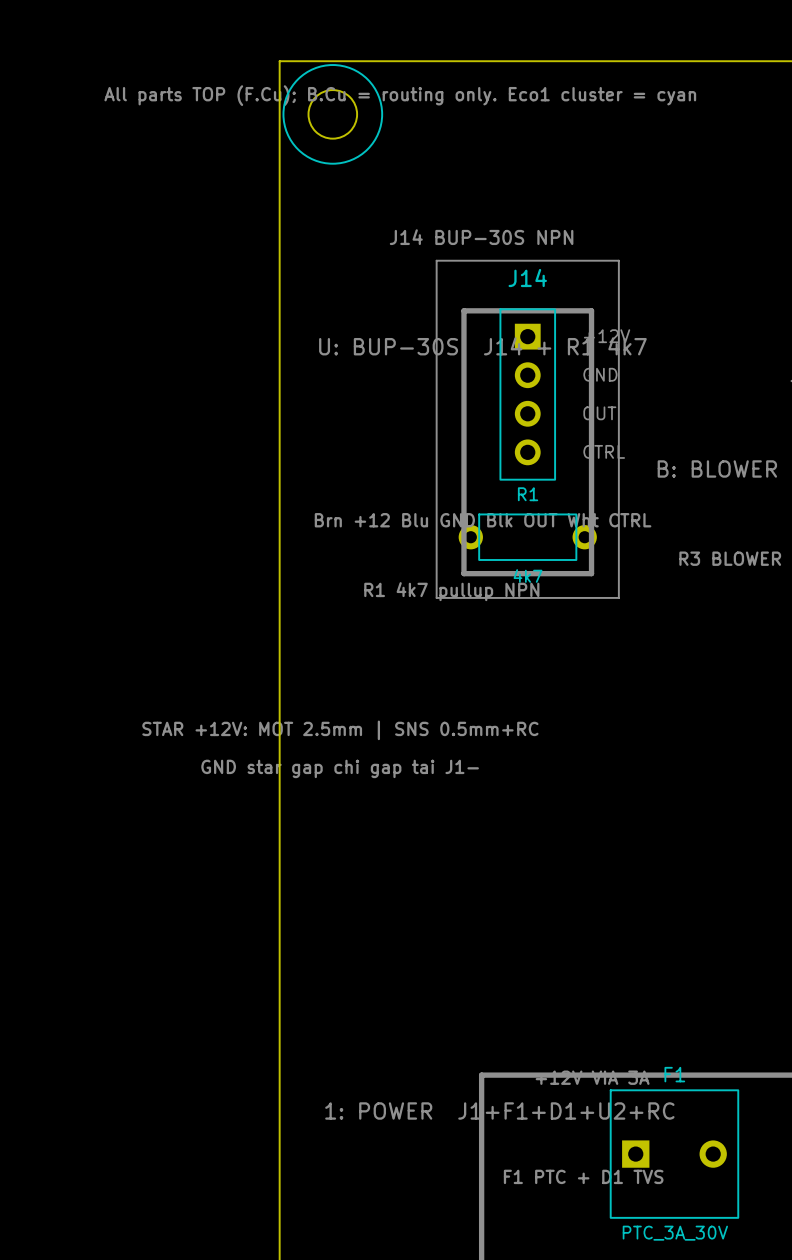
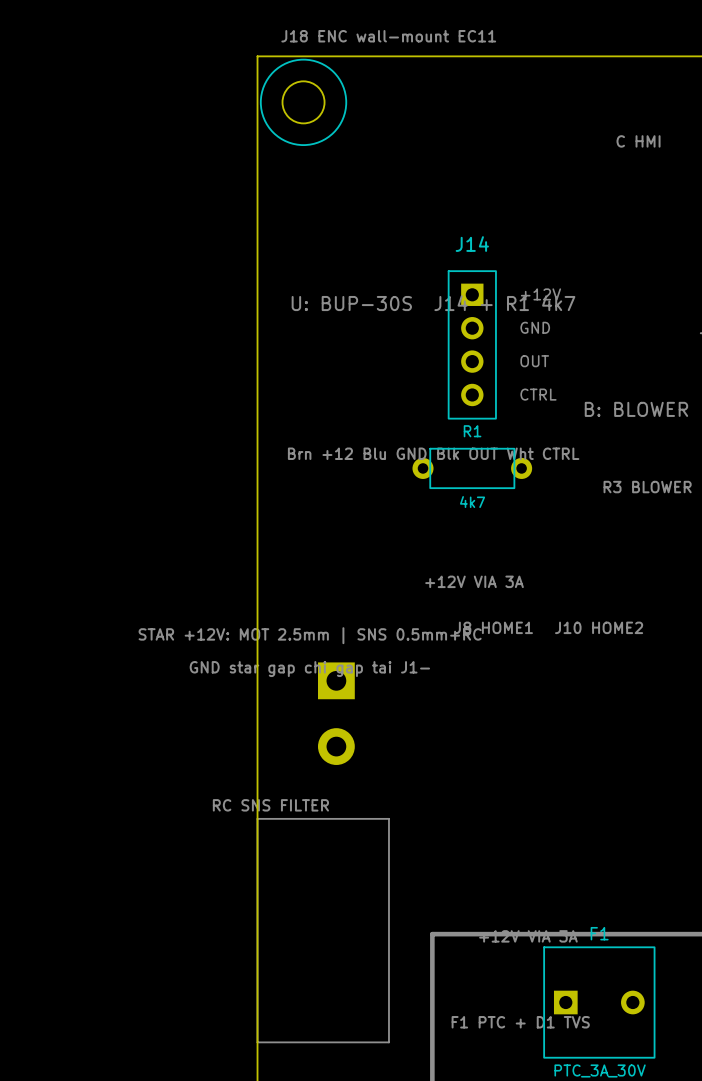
text: none -> J18 ENC wall-mount EC11 (388, 36)
text: All parts TOP (F.Cu); B.Cu = routing only. Eco1 cluster = cyan (400, 95) -> none
text: none -> C HMI (638, 141)
text: J14 BUP-30S NPN (481, 237) -> none
line: (436, 260) (618, 260) (618, 597) (436, 597) (436, 260) -> none
line: (463, 310) (591, 310) (591, 573) (463, 573) (463, 310) -> none
text: R1 4k7 pullup NPN (451, 591) -> none
text: none -> +12V VIA 3A (474, 581)
text: none -> J8 HOME1 (493, 627)
text: none -> J10 HOME2 (599, 627)
part: none -> (336, 713)
text: none -> RC SNS FILTER (270, 805)
line: none -> (257, 818) (257, 1042) (388, 1042) (388, 818) (257, 818)
text: 1: POWER J1+F1+D1+U2+RC (499, 1111) -> none

